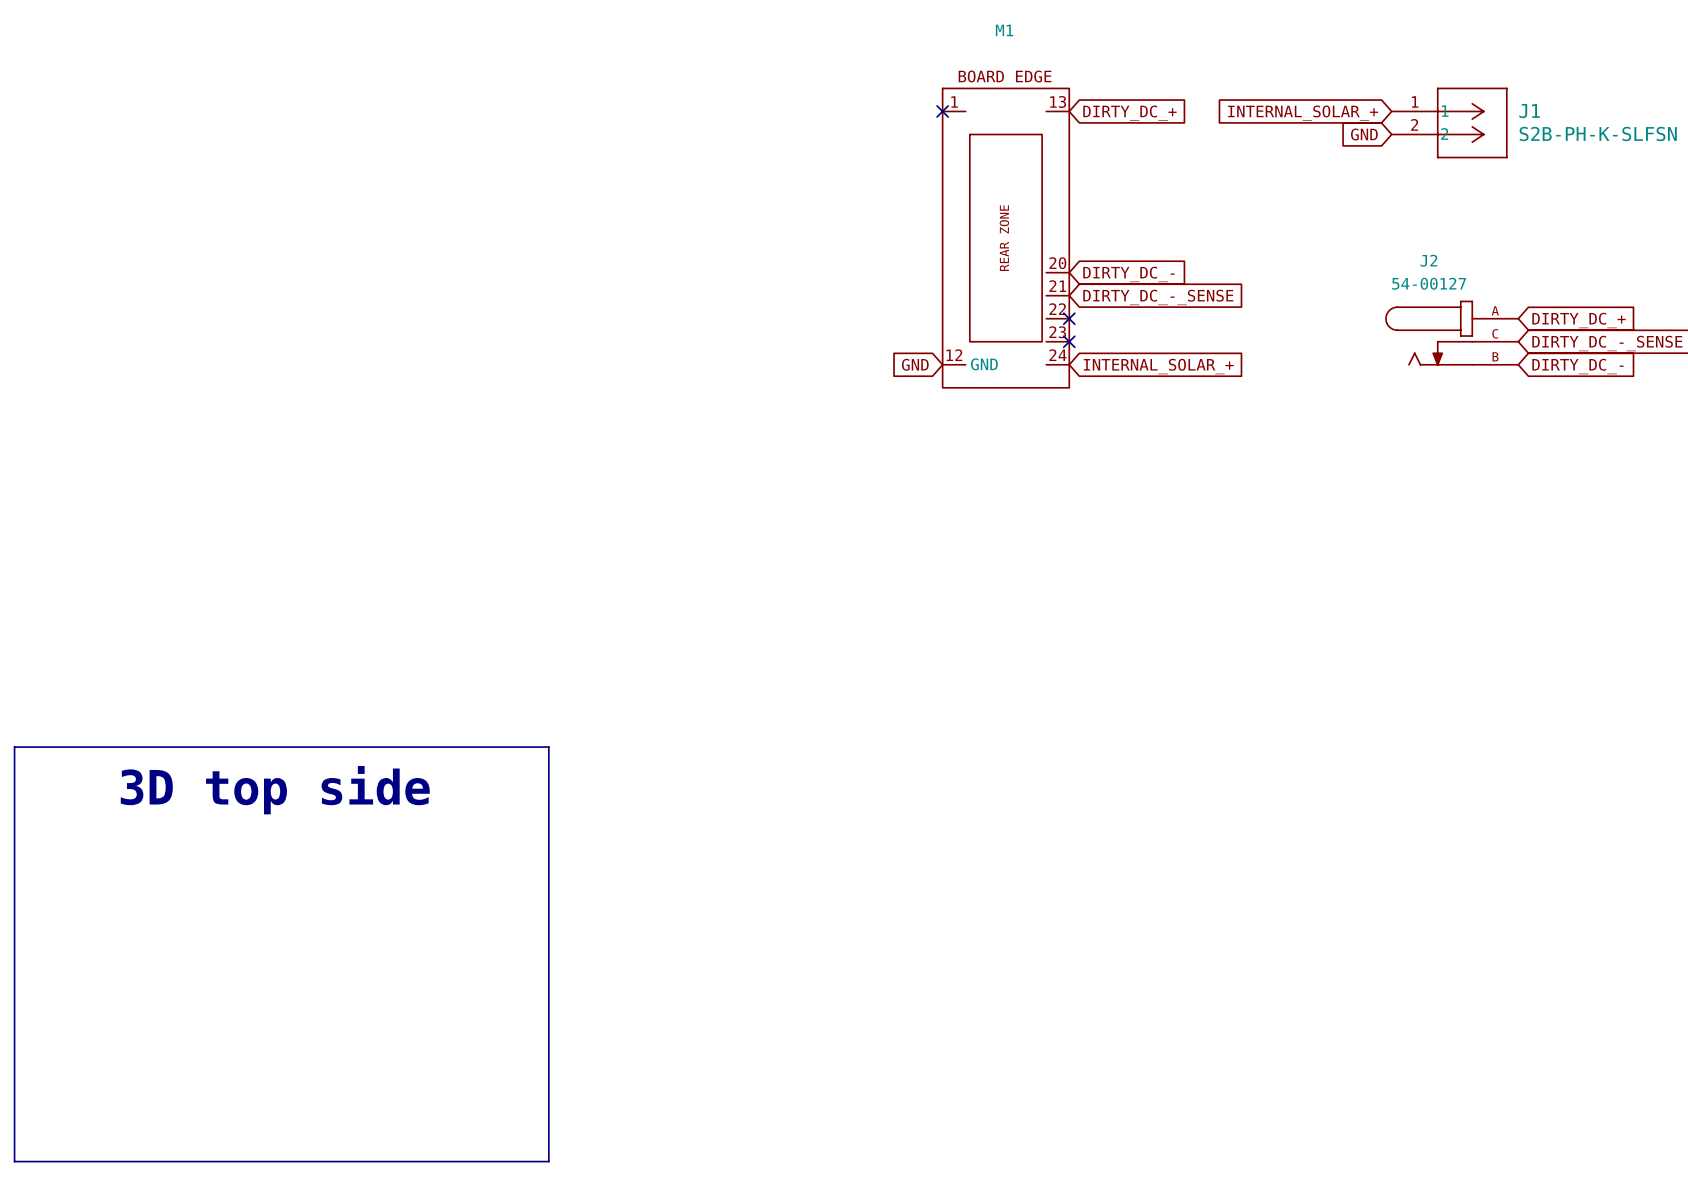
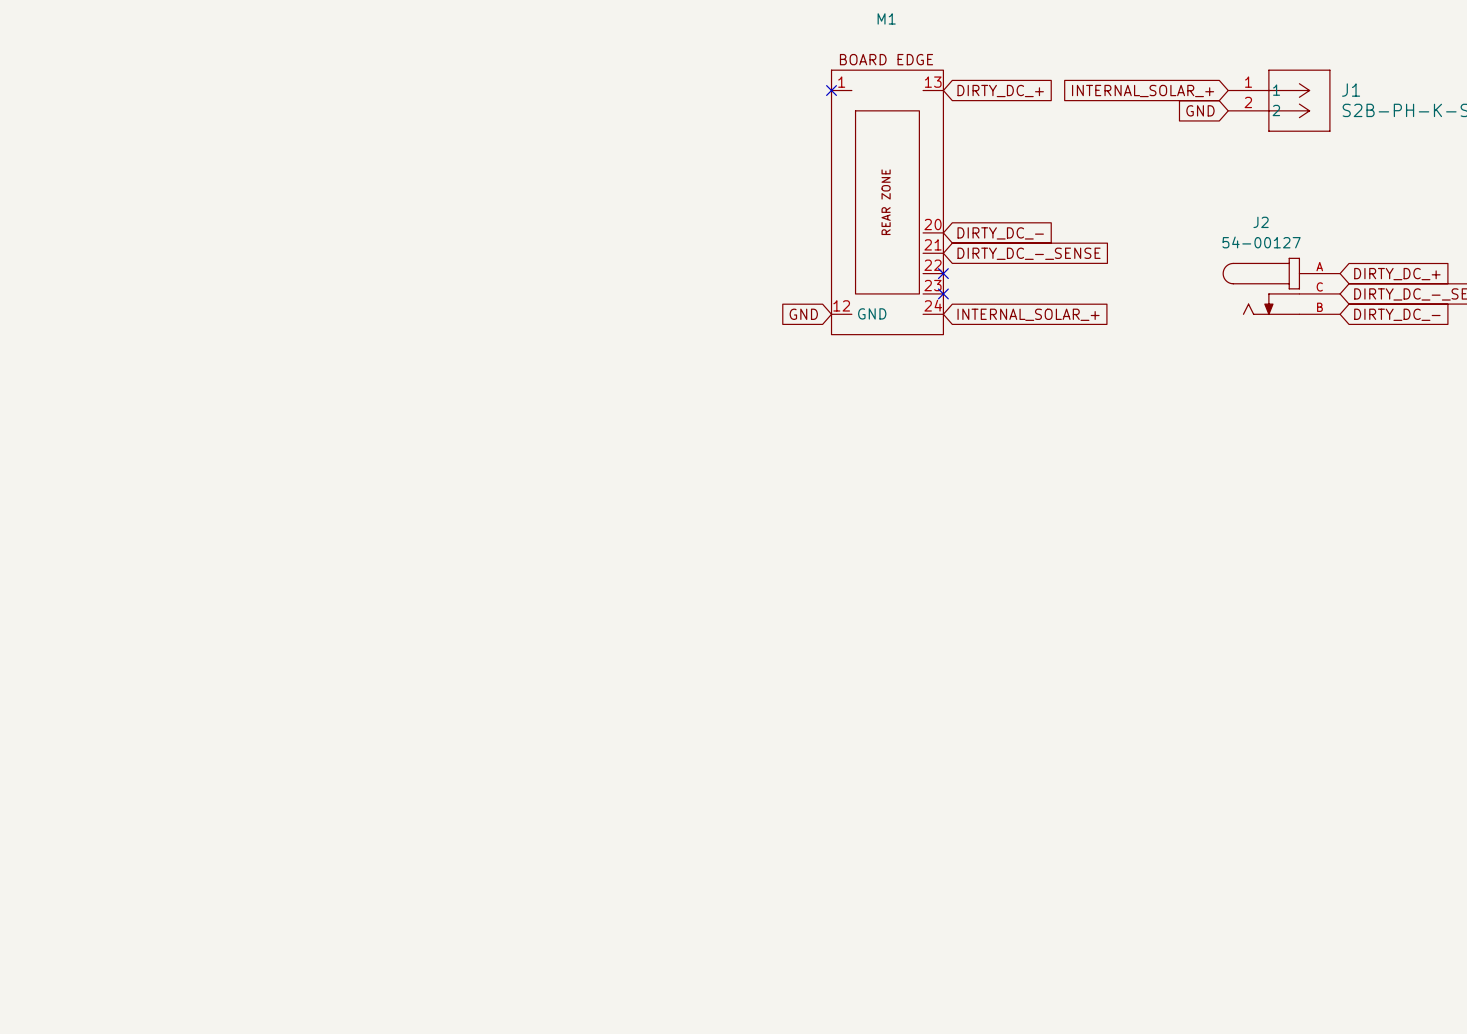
line: (14, 747) (548, 747) (548, 1161) (14, 1161) (14, 747) -> none
text: 3D top side (275, 790) -> none

